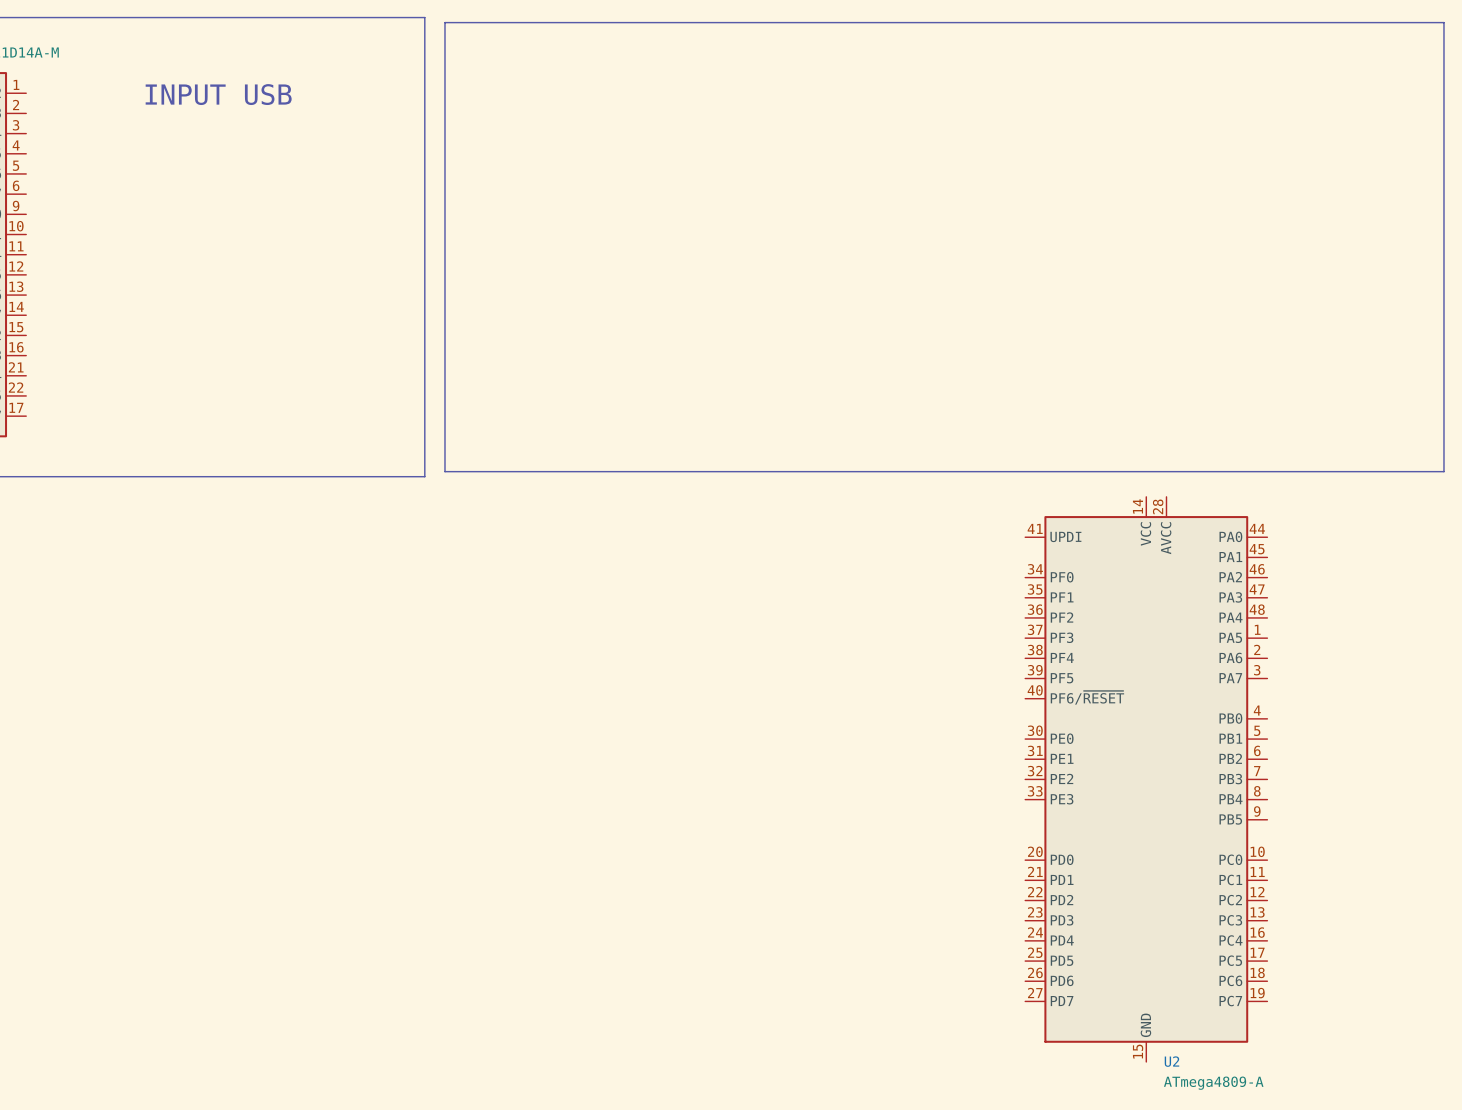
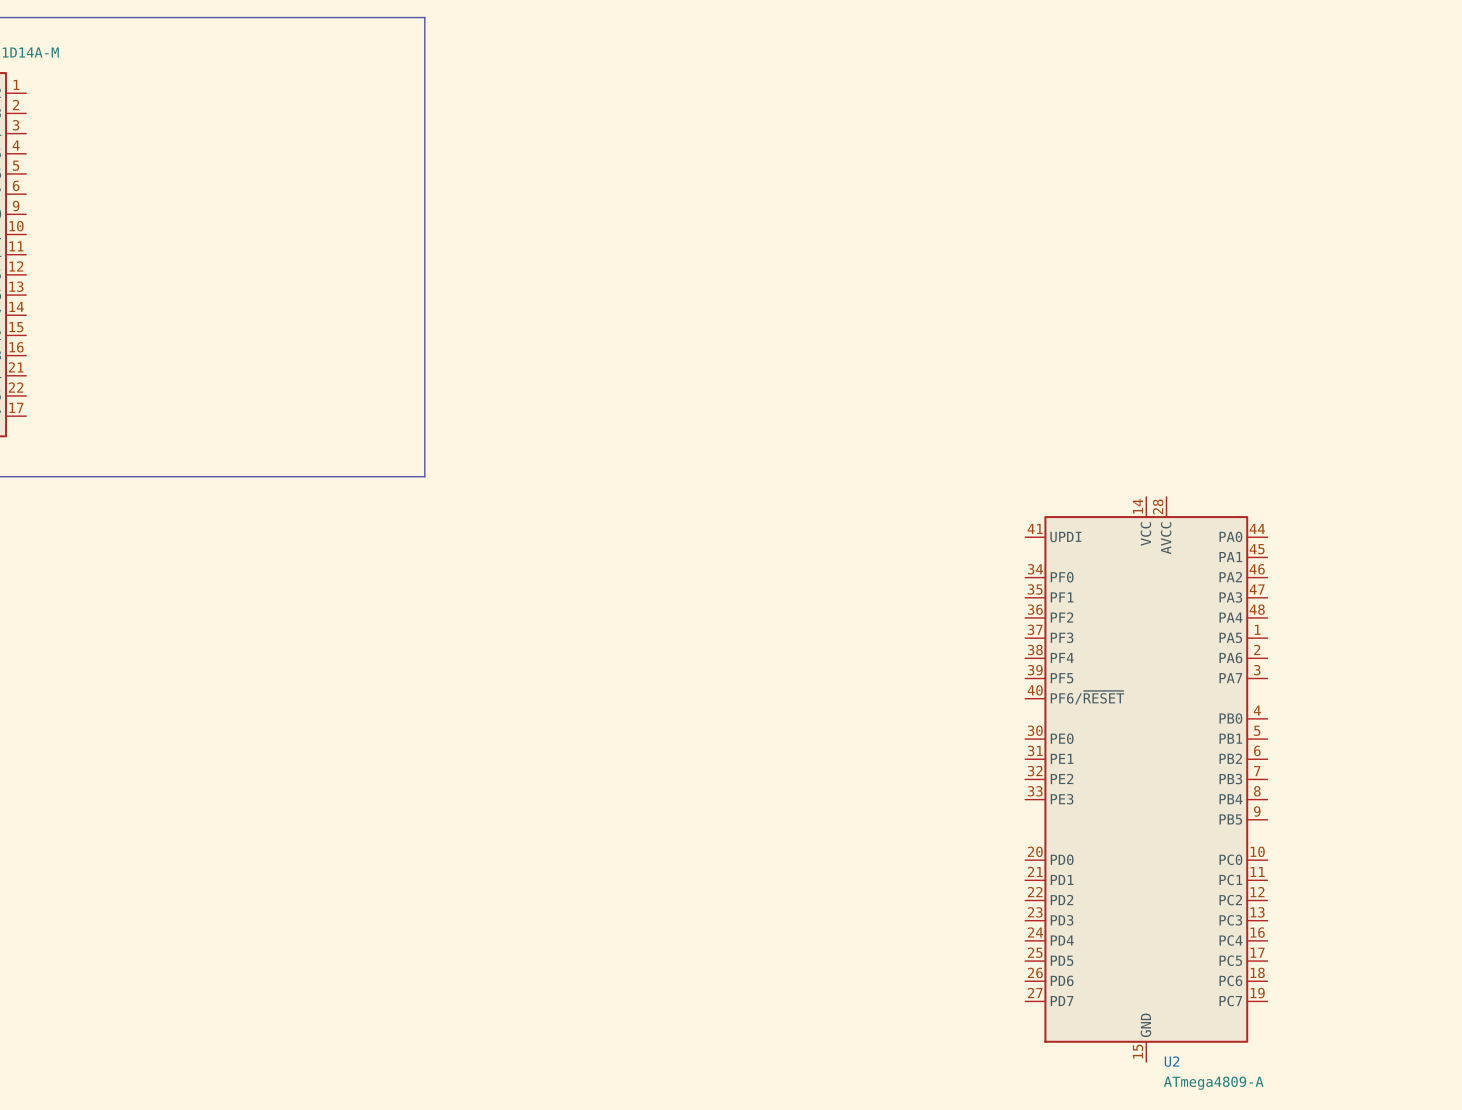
line: (444, 22) (1443, 22) (1443, 471) (444, 471) (444, 22) -> none
text: INPUT USB (218, 94) -> none

